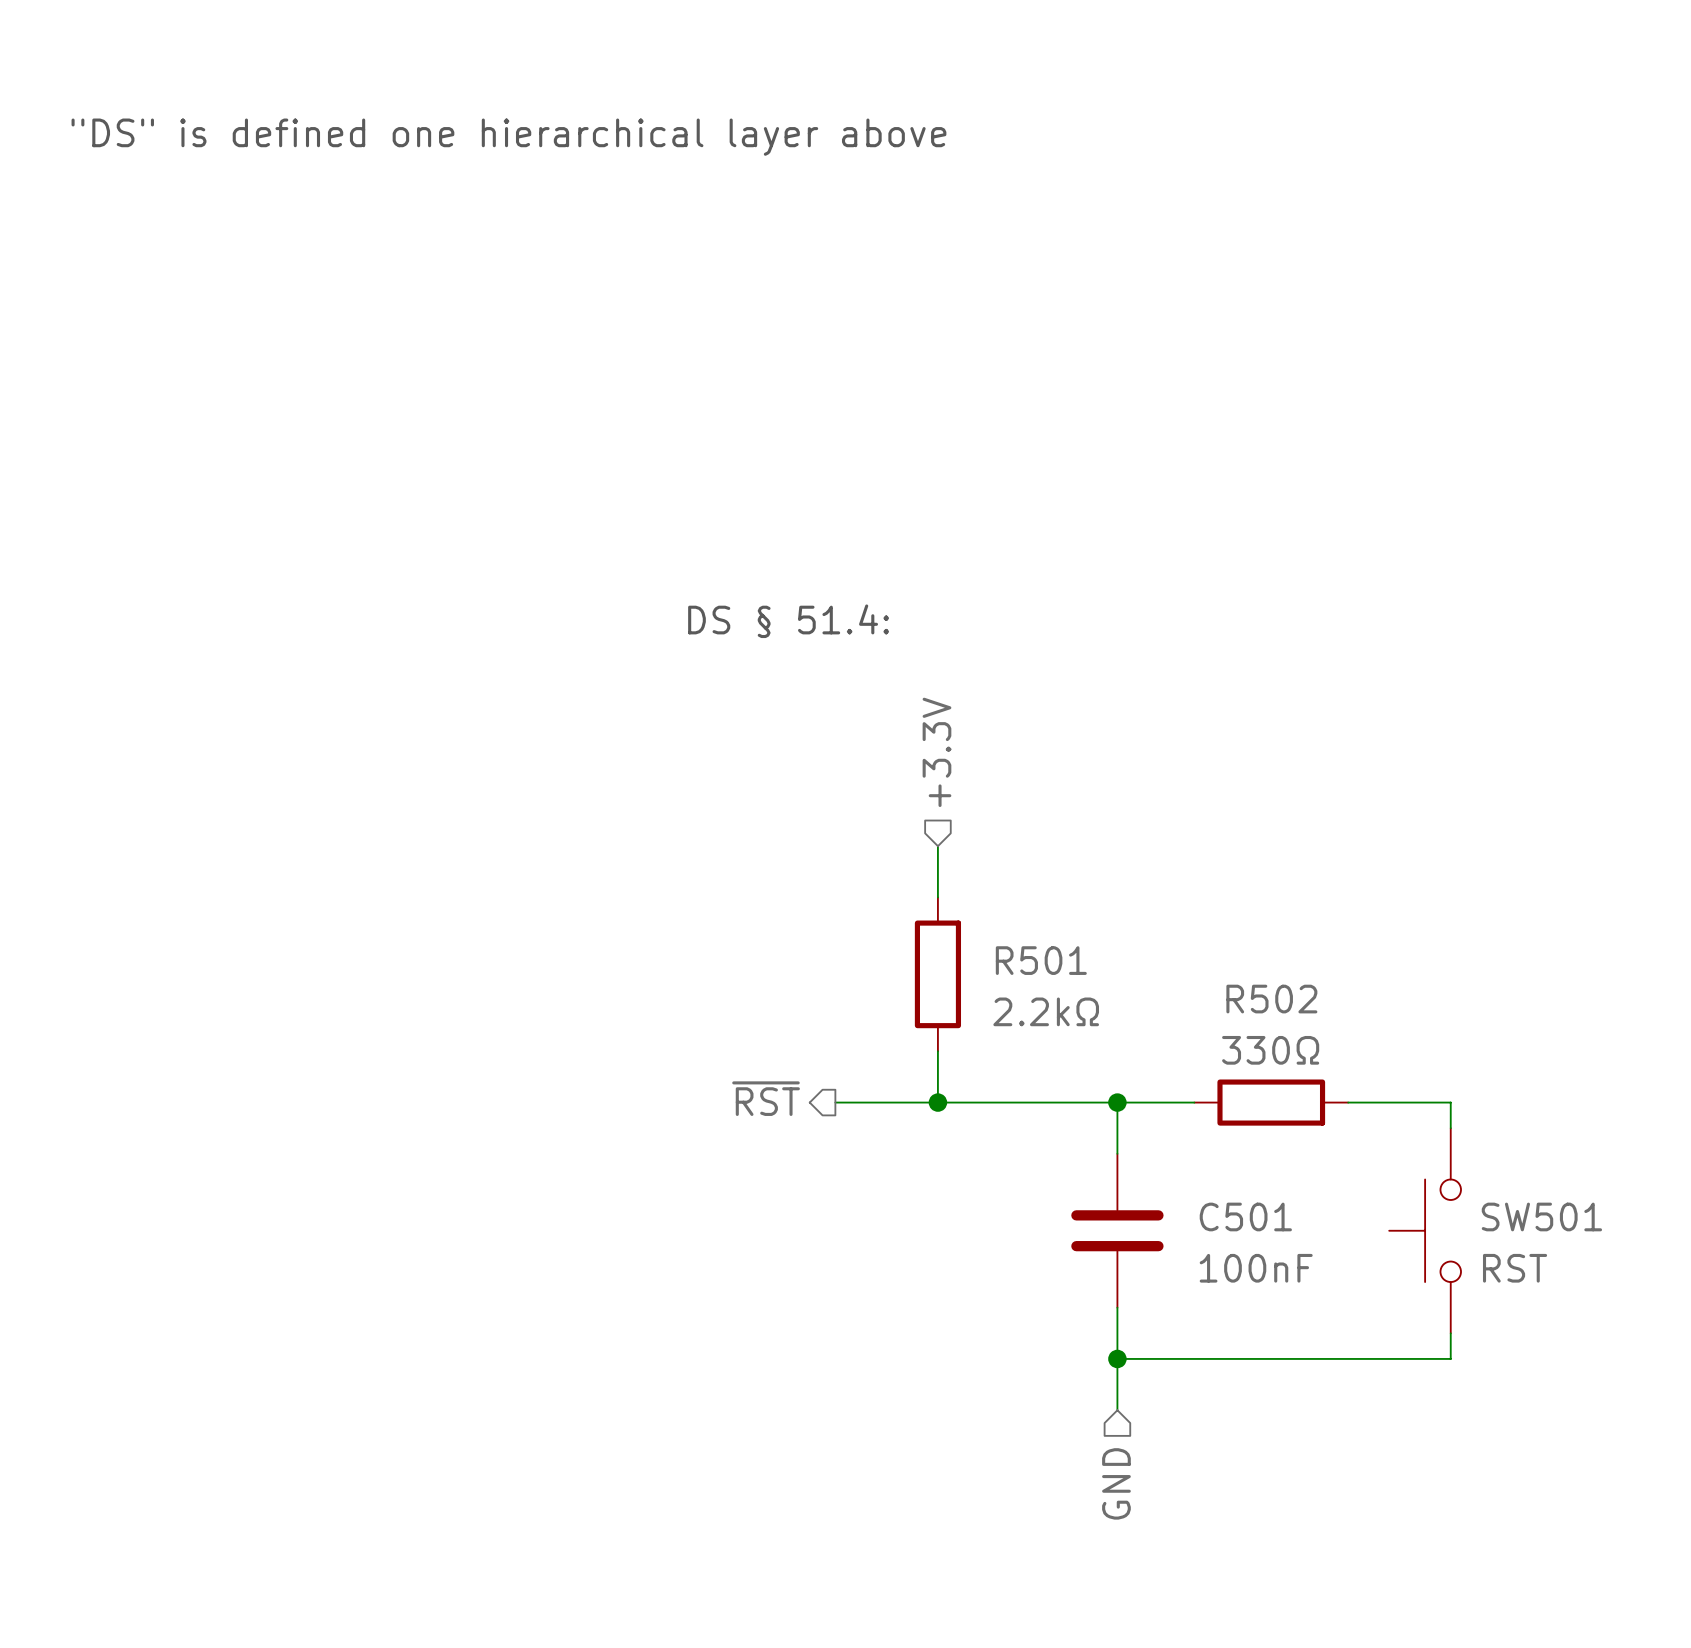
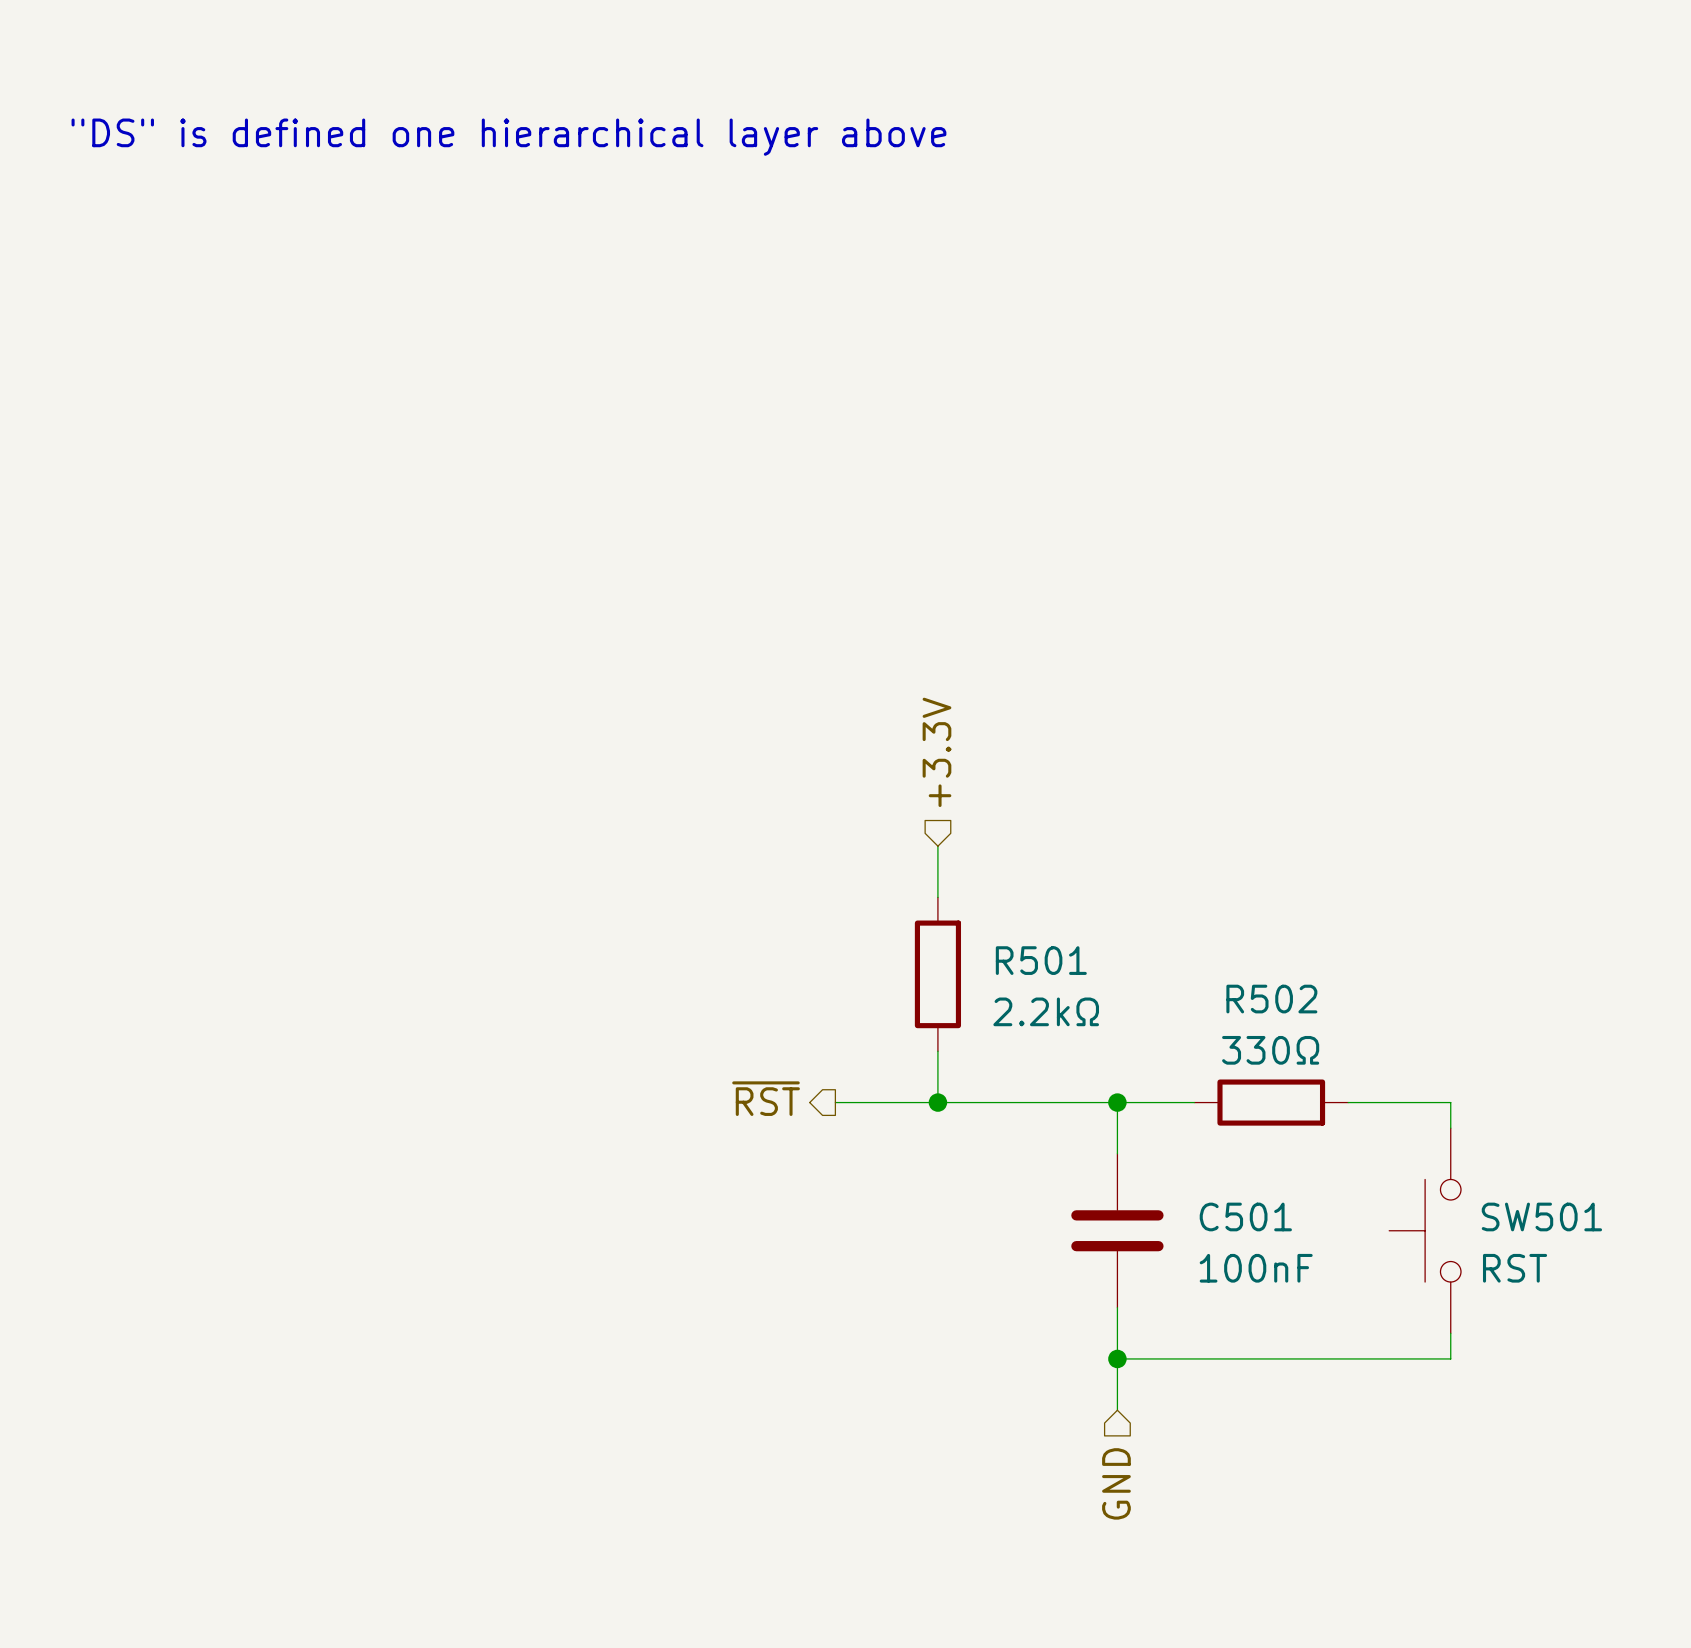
text: DS § 51.4: (788, 621) -> none

